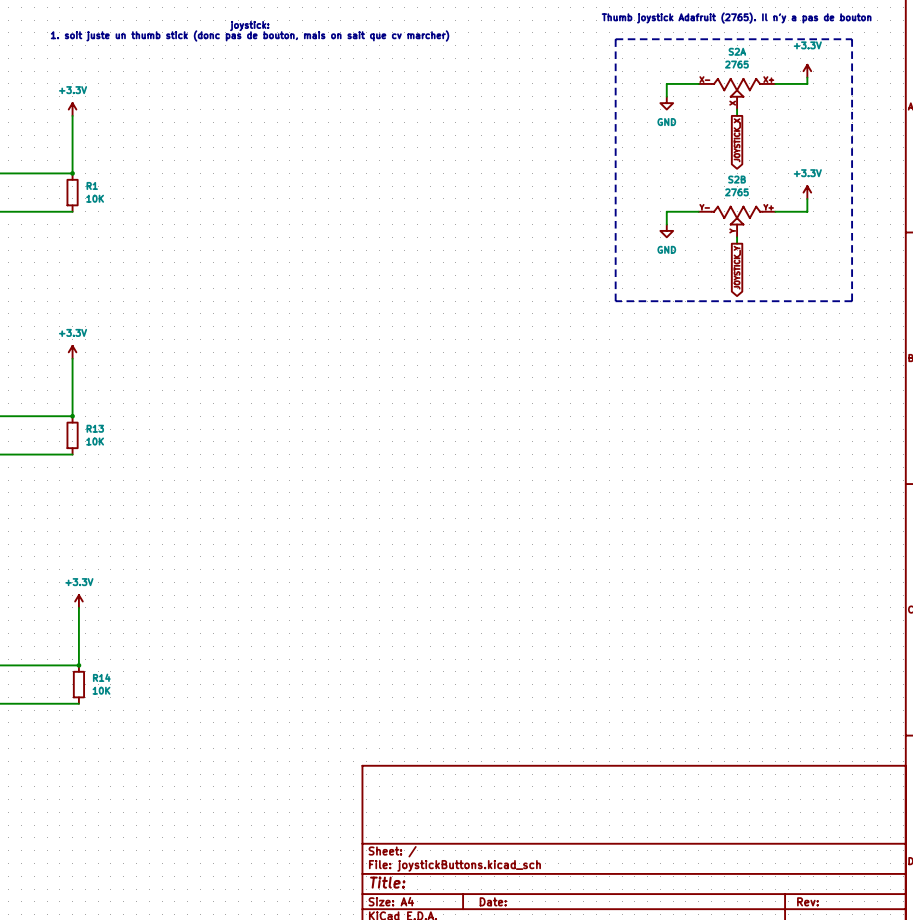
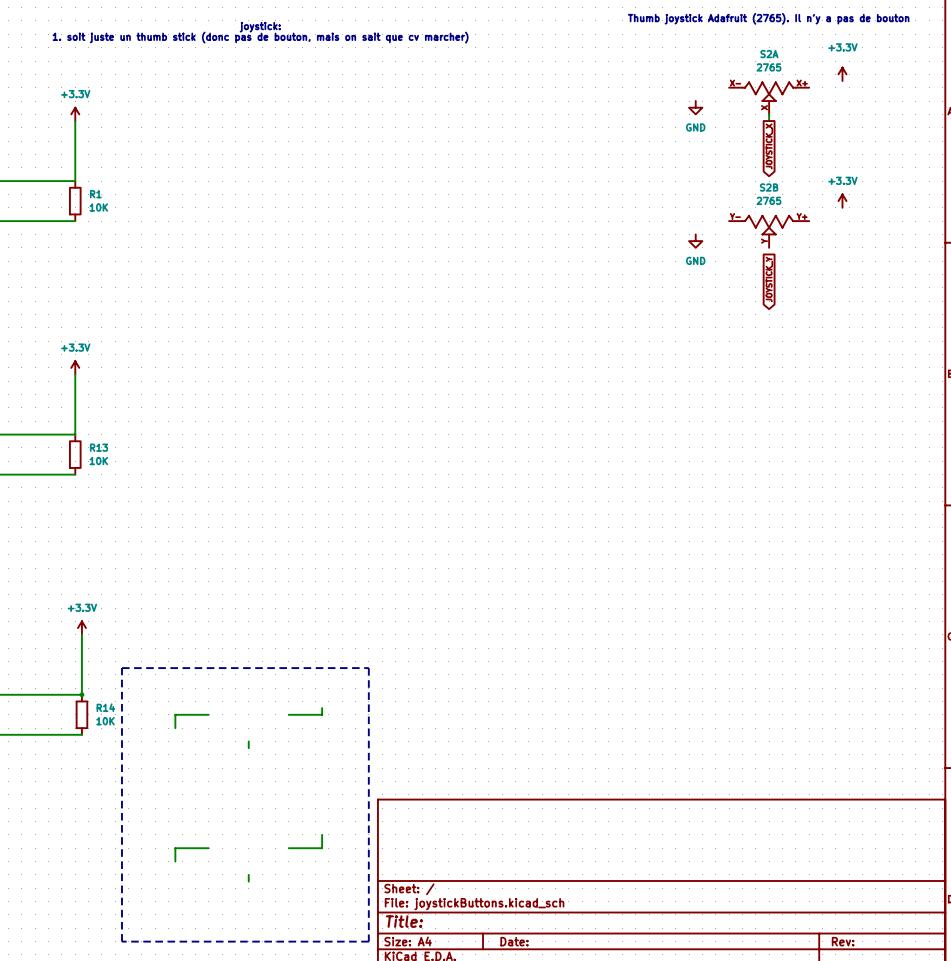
line: (615, 39) (852, 39) (852, 301) (615, 301) (615, 39) -> none
wire: (807, 77) (807, 83) (775, 83) -> none
wire: (698, 83) (666, 83) (666, 96) -> none
junction: (72, 173) -> none
wire: (807, 198) (807, 211) (775, 211) -> none
wire: (698, 211) (666, 211) (666, 224) -> none
wire: (737, 237) (737, 243) -> none
junction: (72, 416) -> none
line: none -> (121, 668) (368, 668) (368, 941) (121, 941) (121, 668)
wire: none -> (322, 708) (322, 714) (288, 714)
wire: none -> (208, 714) (175, 714) (175, 728)
wire: none -> (248, 741) (248, 748)
wire: none -> (322, 834) (322, 848) (288, 848)
wire: none -> (208, 848) (175, 848) (175, 861)
wire: none -> (248, 874) (248, 881)

